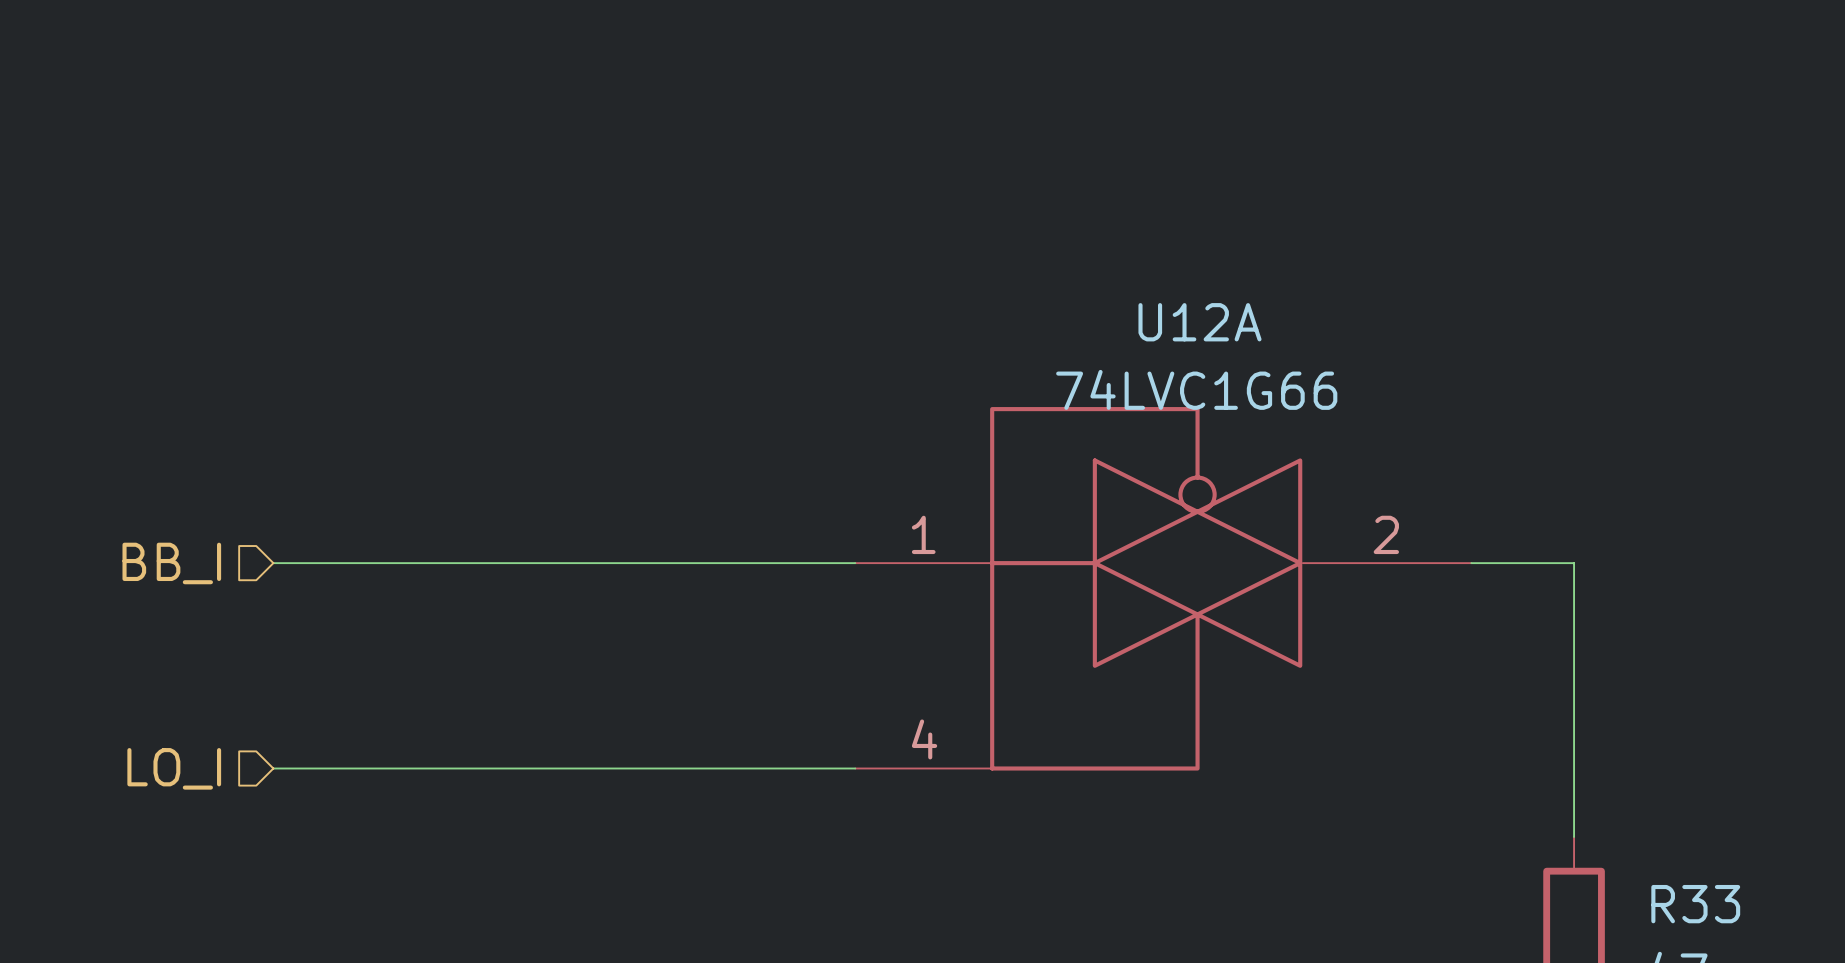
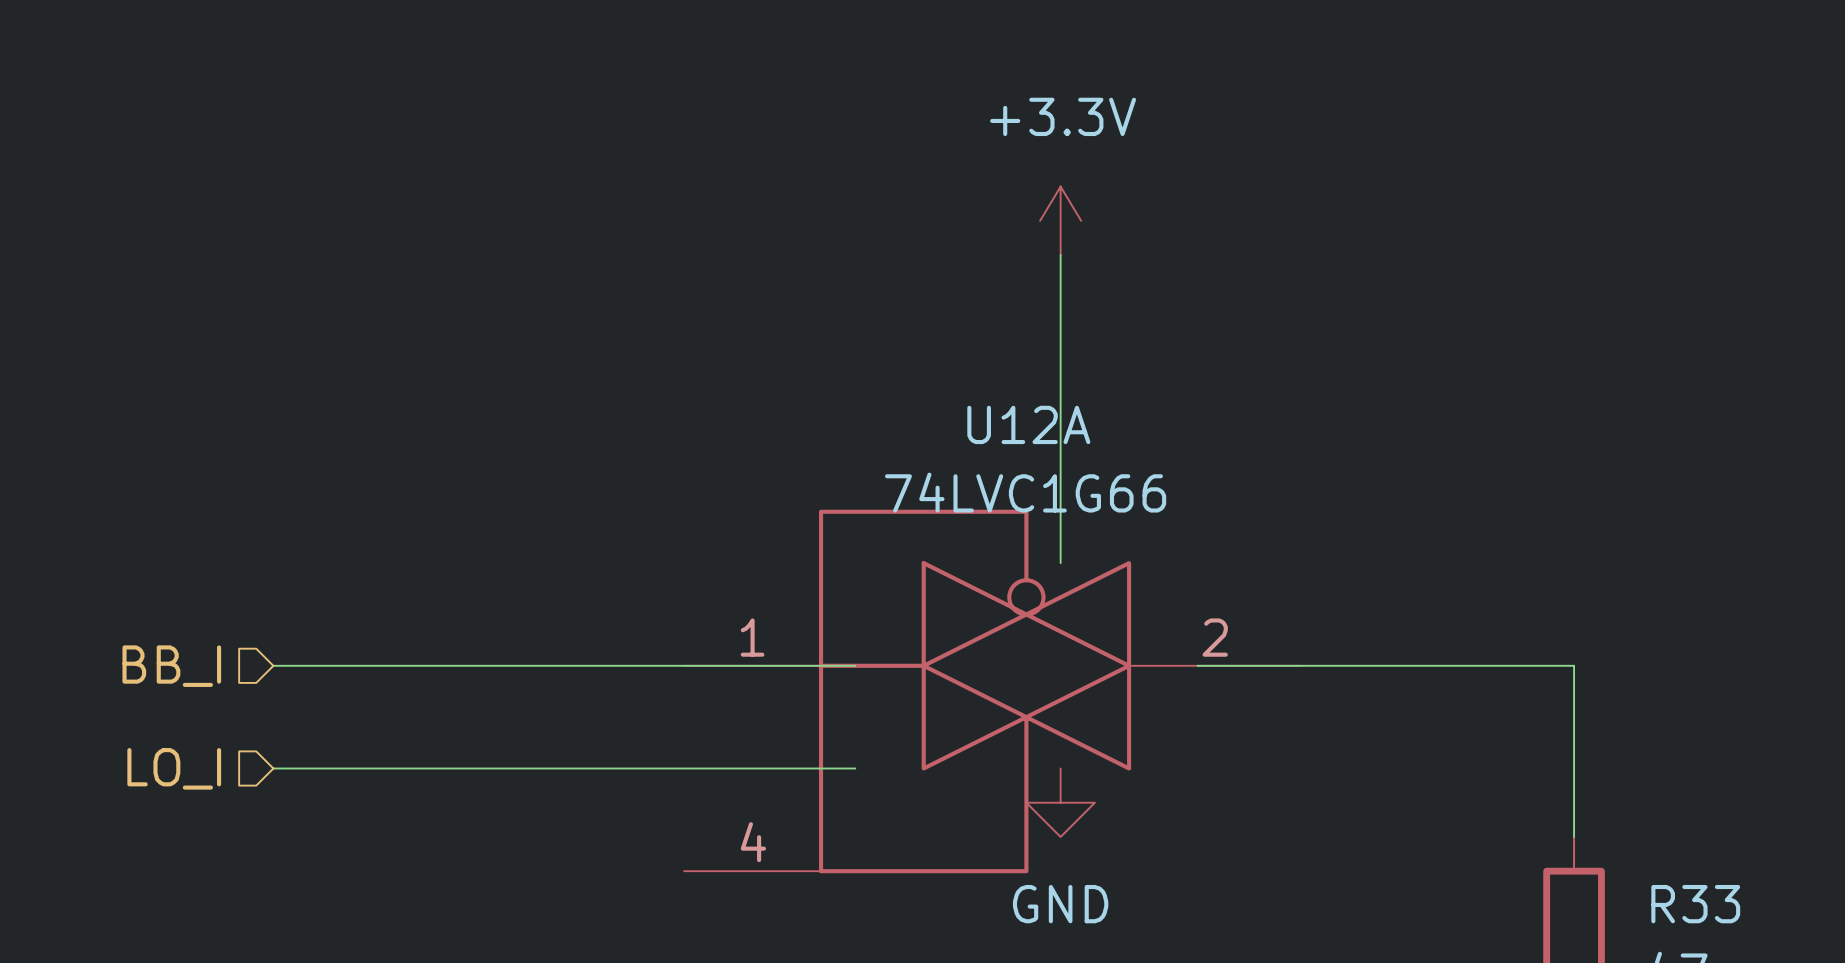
power symbol: none -> +3.3V (1060, 220)
wire: none -> (1060, 255) (1060, 563)
hierarchical label position: BB_I (171, 563) -> BB_I (171, 666)
wire: (273, 563) (855, 563) -> (273, 665) (855, 665)
wire: (1471, 563) (1574, 563) (1574, 665) -> (1197, 665) (1574, 665)
U12A position: (1163, 588) -> (992, 691)
power symbol: none -> GND (1060, 802)

